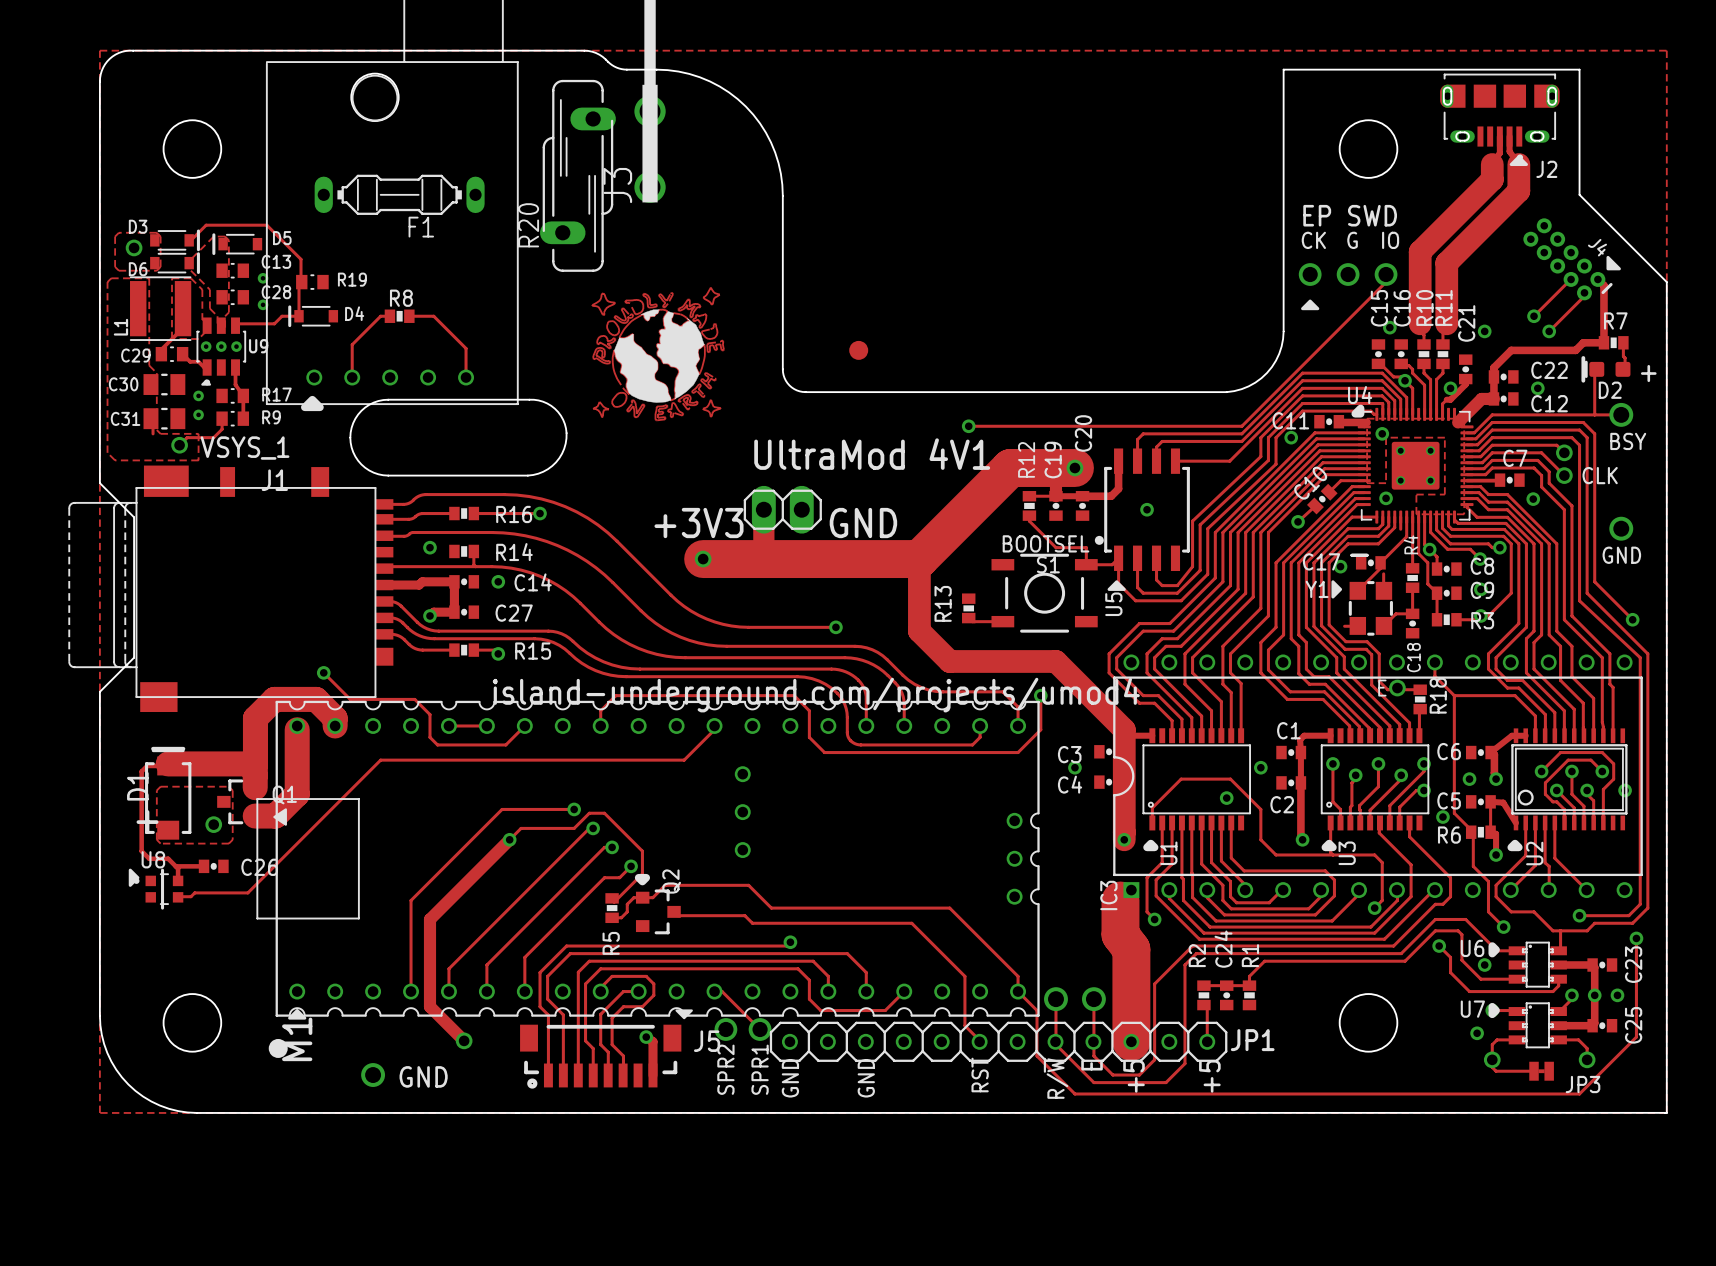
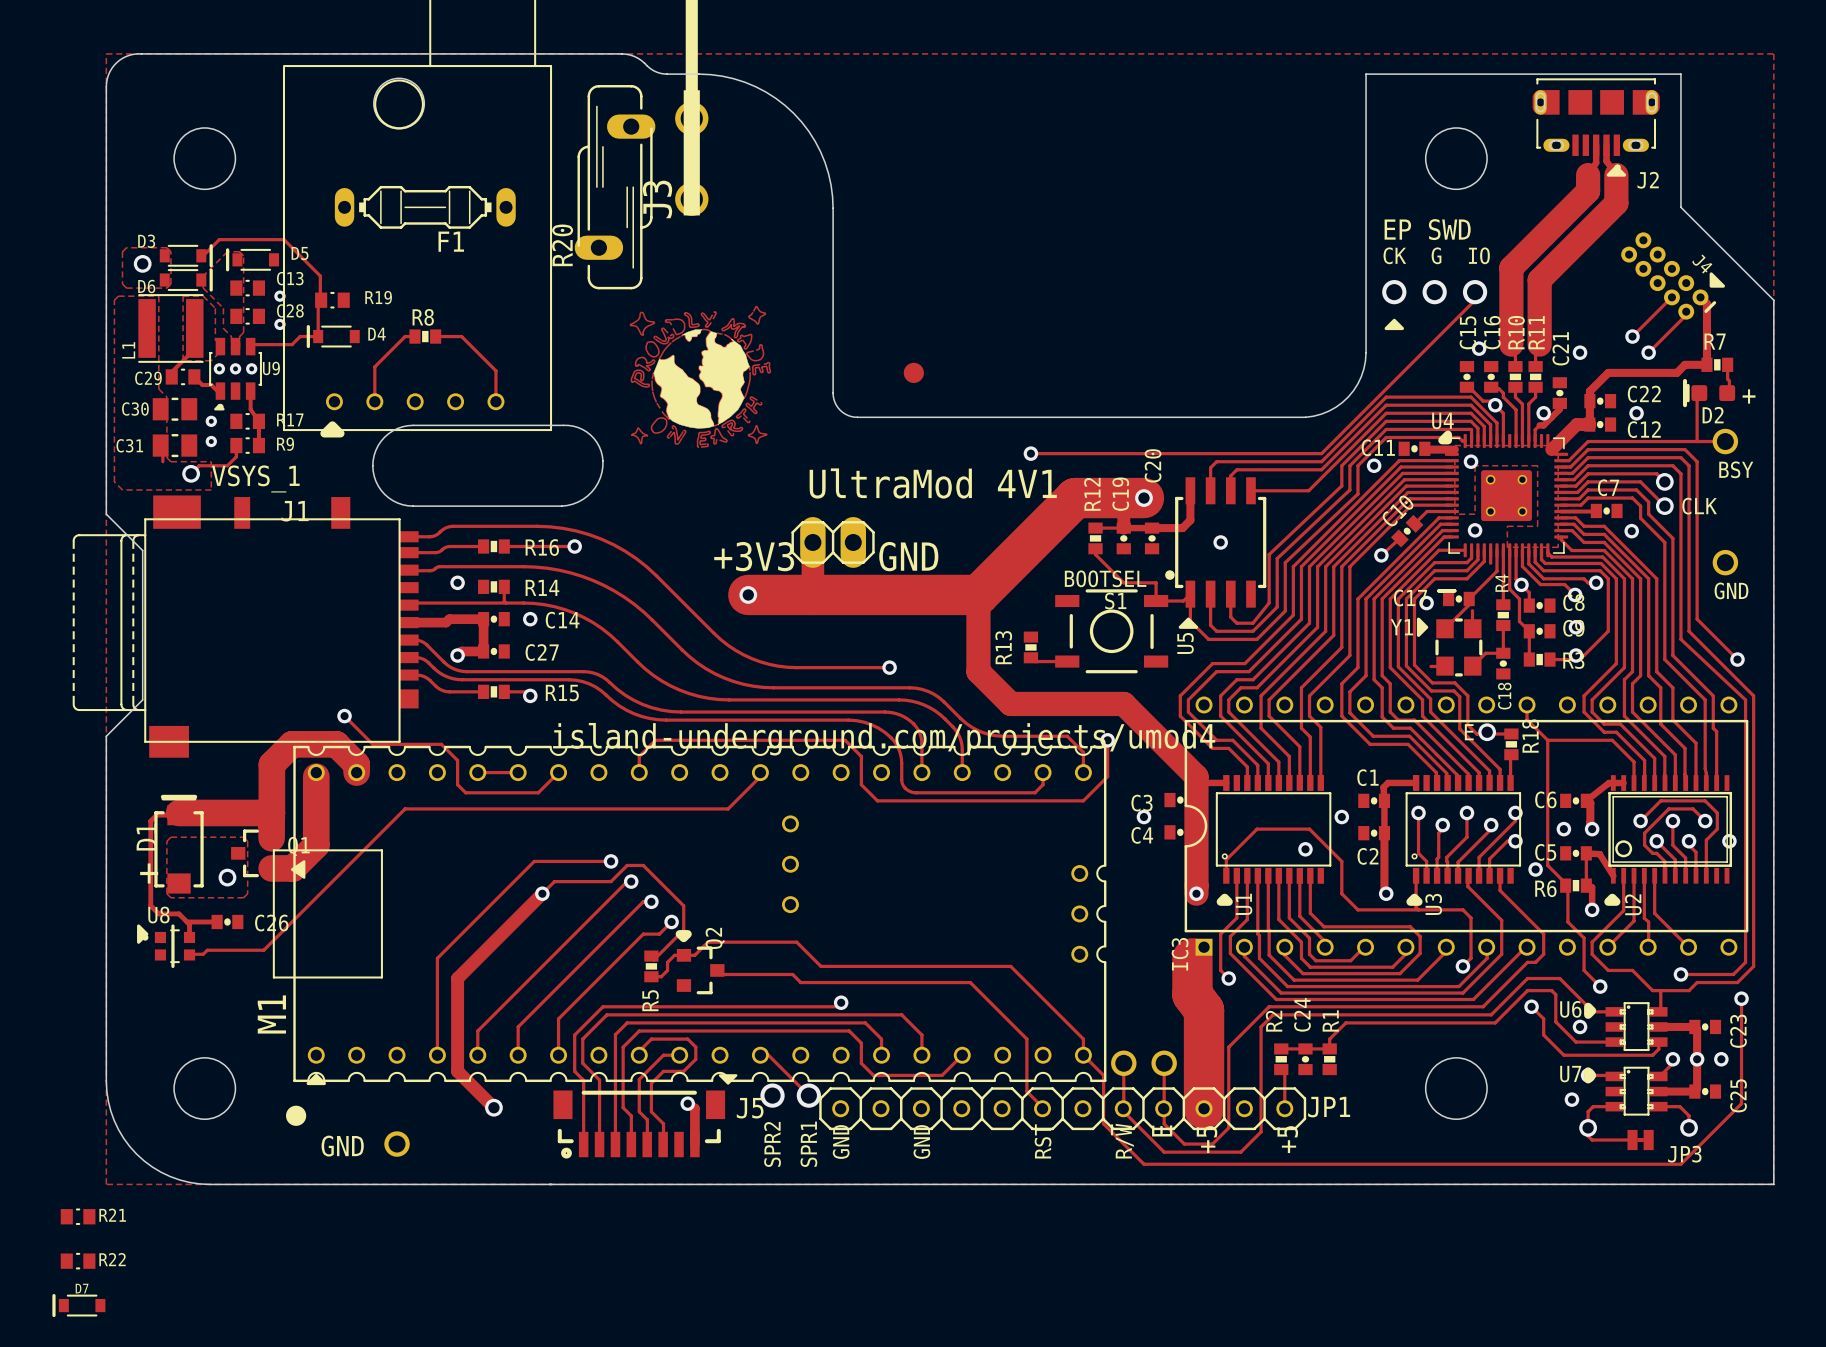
M1 name position: M1 (297, 1039) -> M1 (271, 1014)
text position: GND (423, 1076) -> GND (342, 1146)
R21: none -> (78, 1216)
R22: none -> (78, 1261)
D7: none -> (78, 1305)

